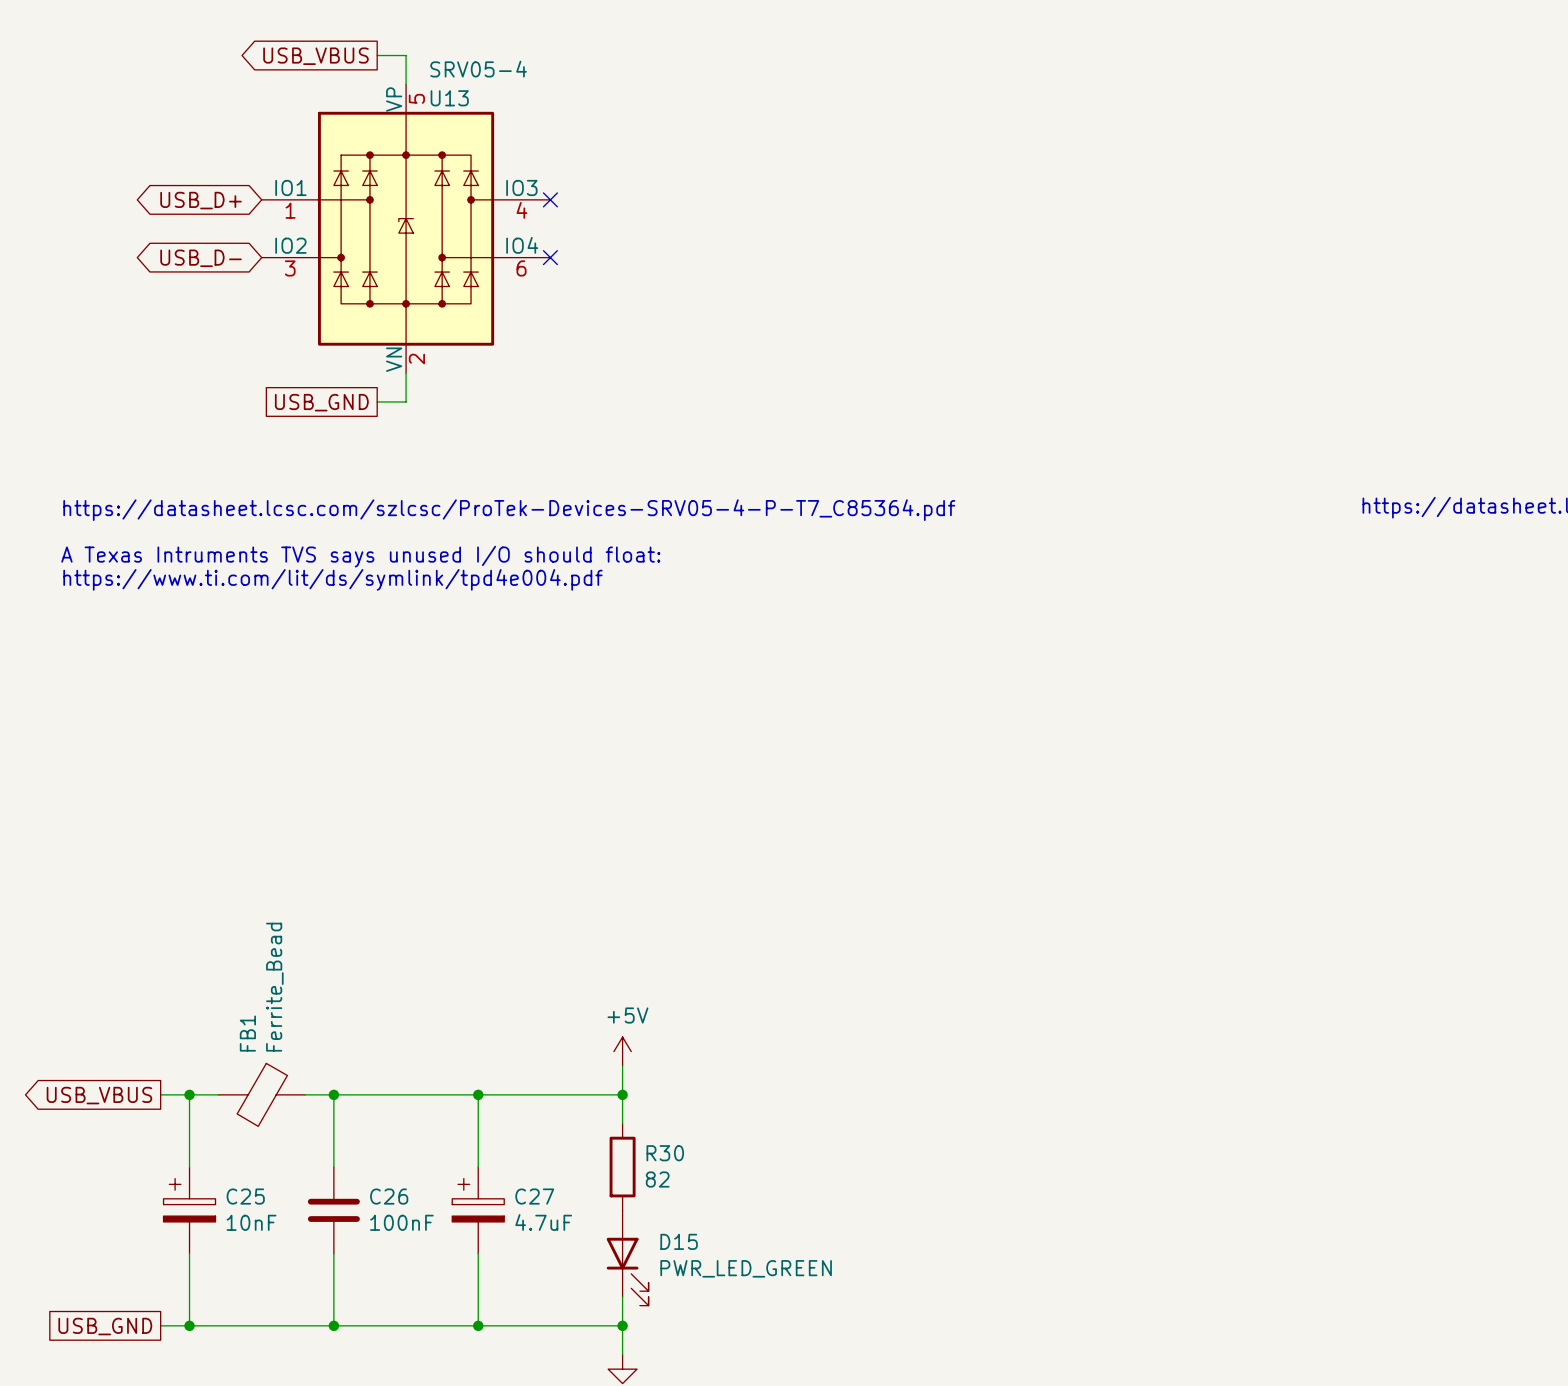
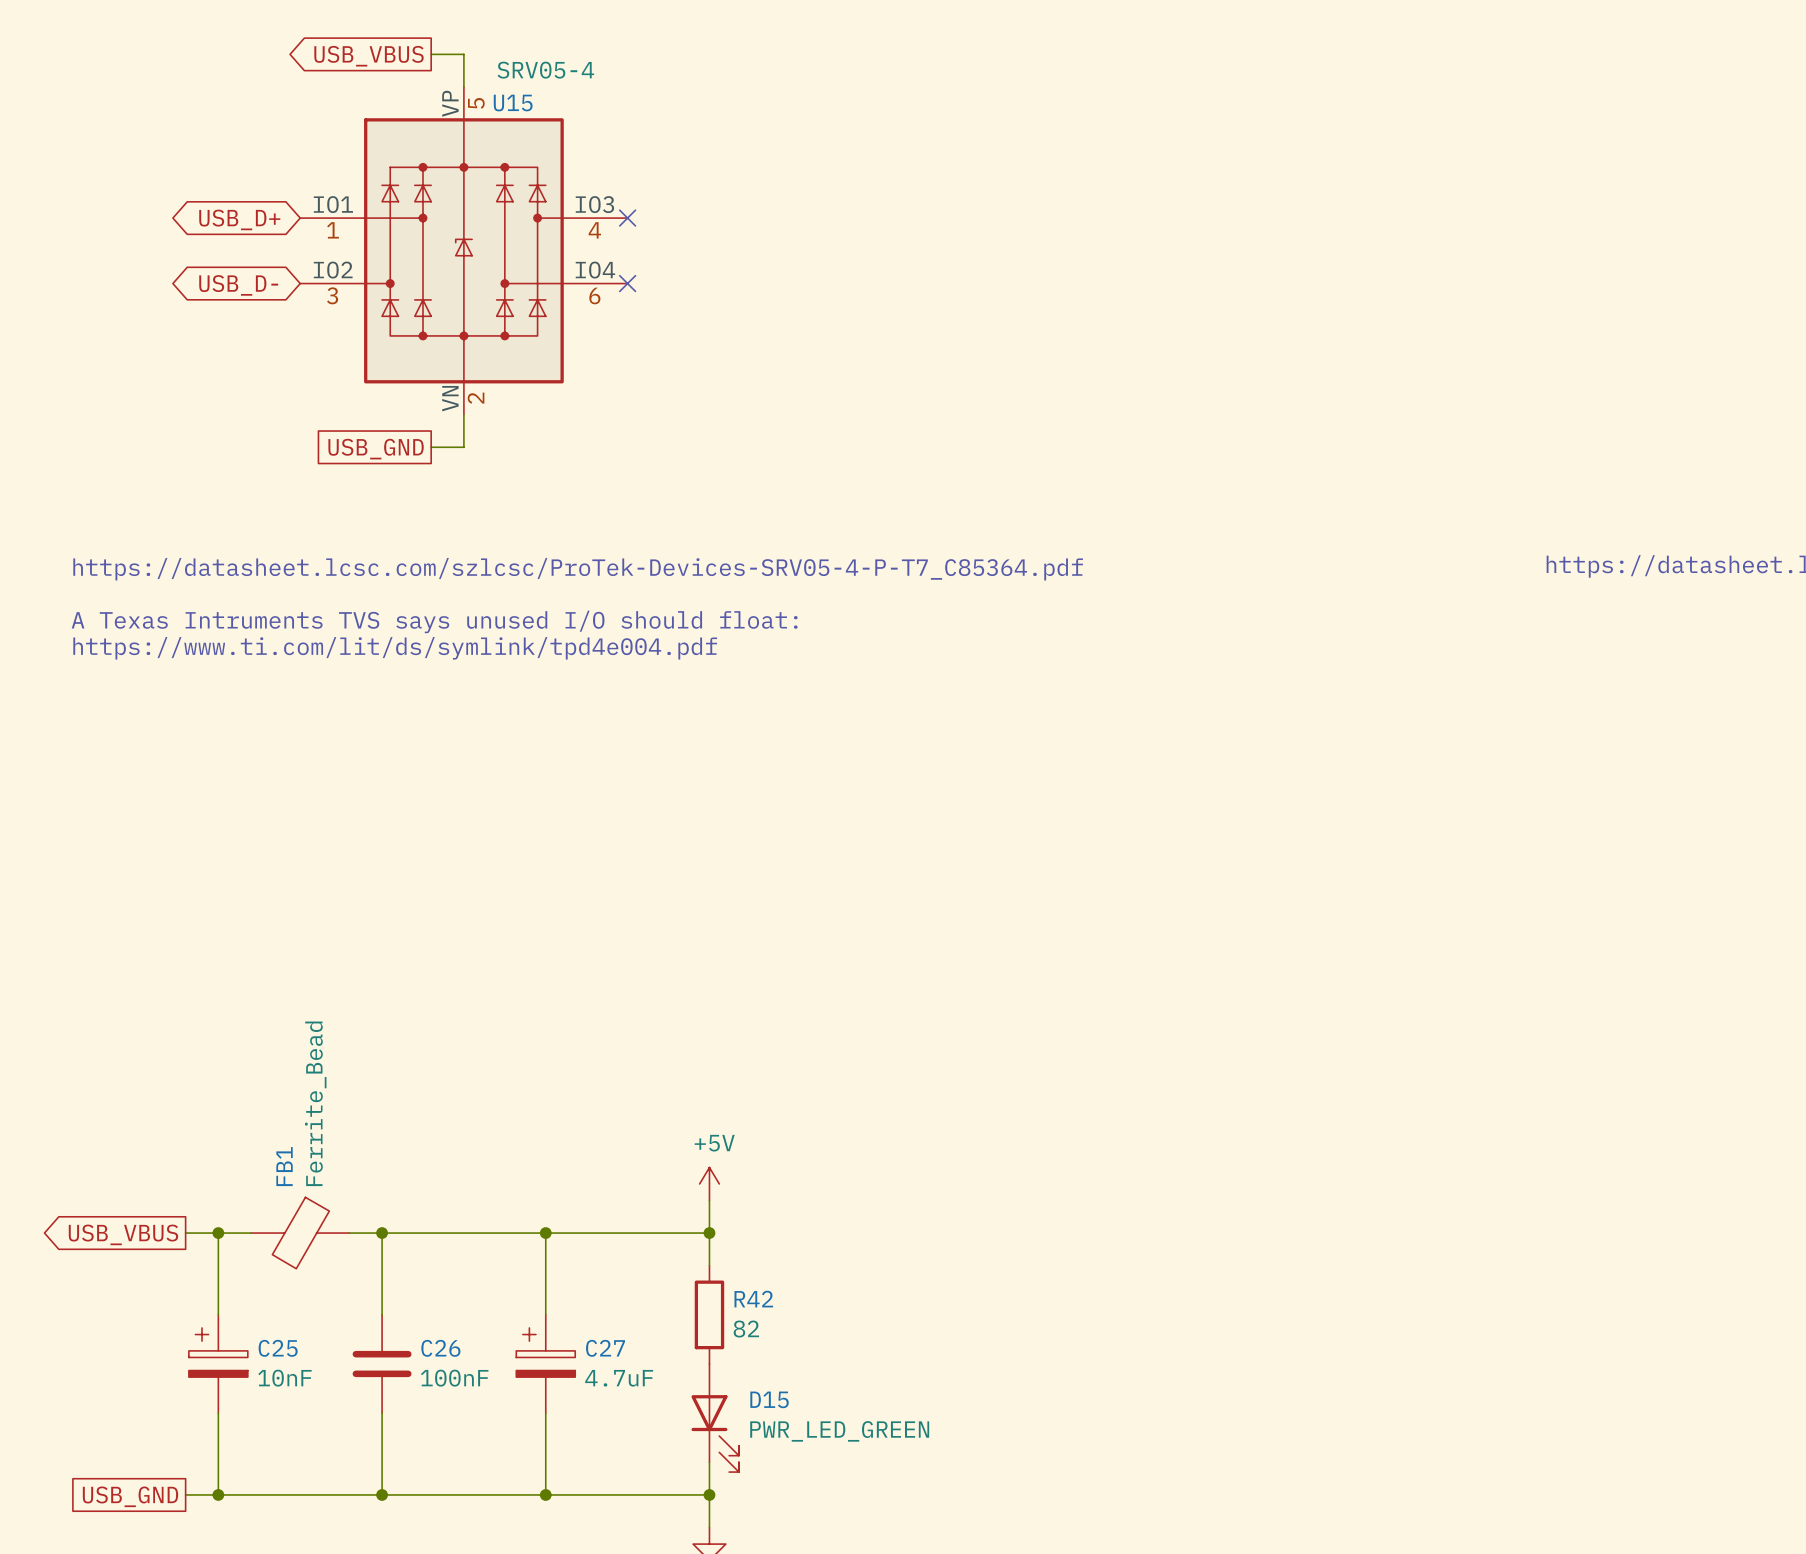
U13 name: U13 (449, 98) -> U15 (513, 103)
R30 name: R30 (665, 1153) -> R42 (753, 1299)

